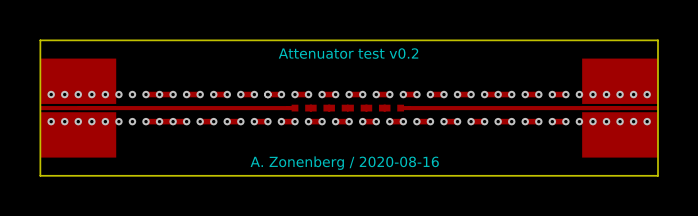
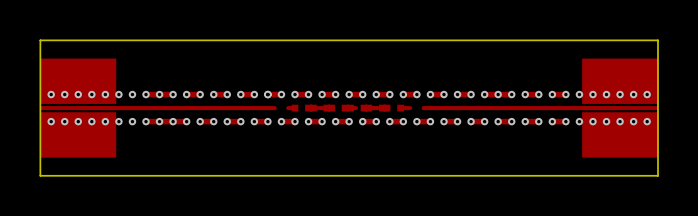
text: Attenuator test v0.2 (348, 53) -> none
track: (274, 108) (288, 108) -> none
track: none -> (315, 108) (326, 108)
track: none -> (350, 108) (355, 108)
track: none -> (369, 108) (382, 108)
track: (410, 108) (423, 108) -> none
text: A. Zonenberg / 2020-08-16 (344, 163) -> none

